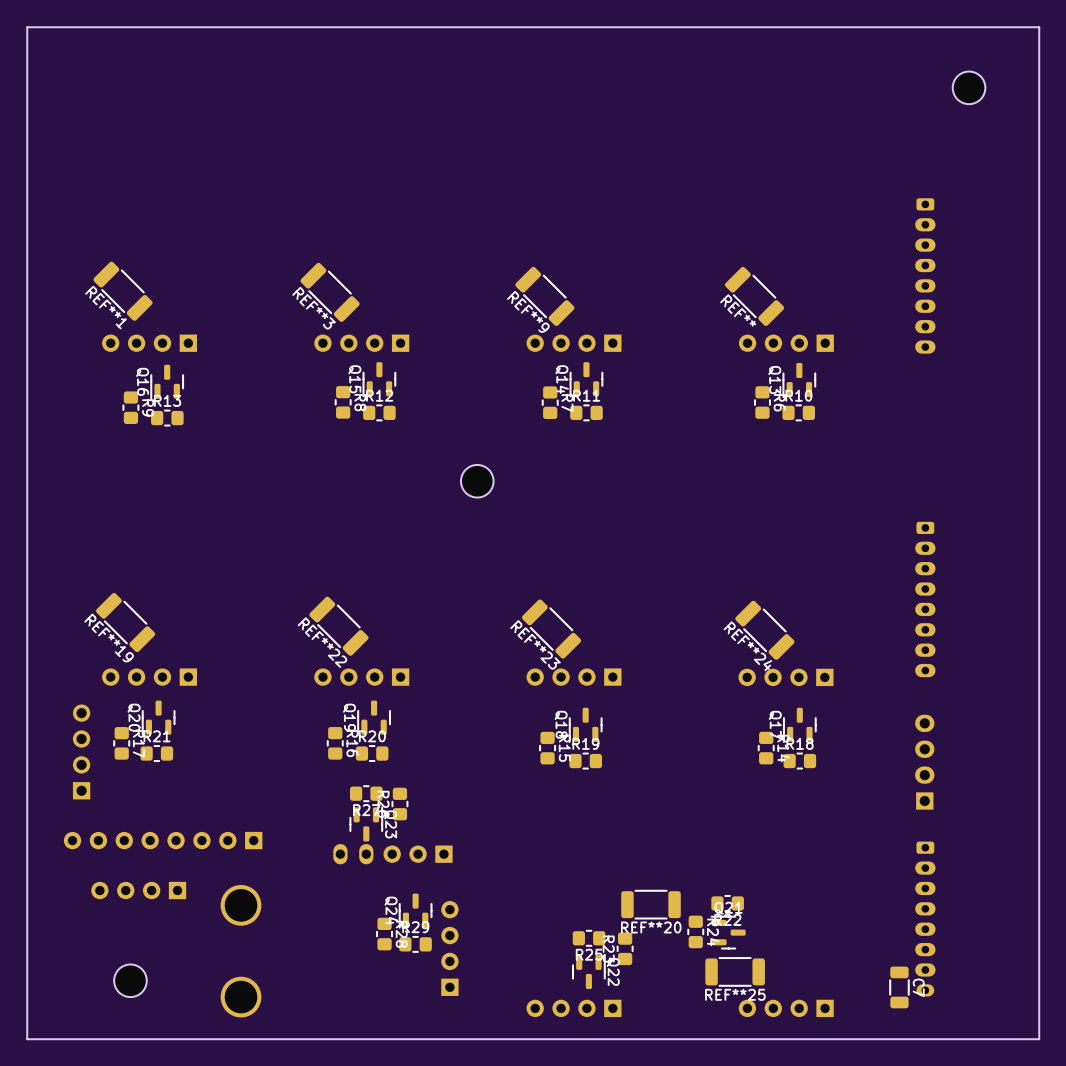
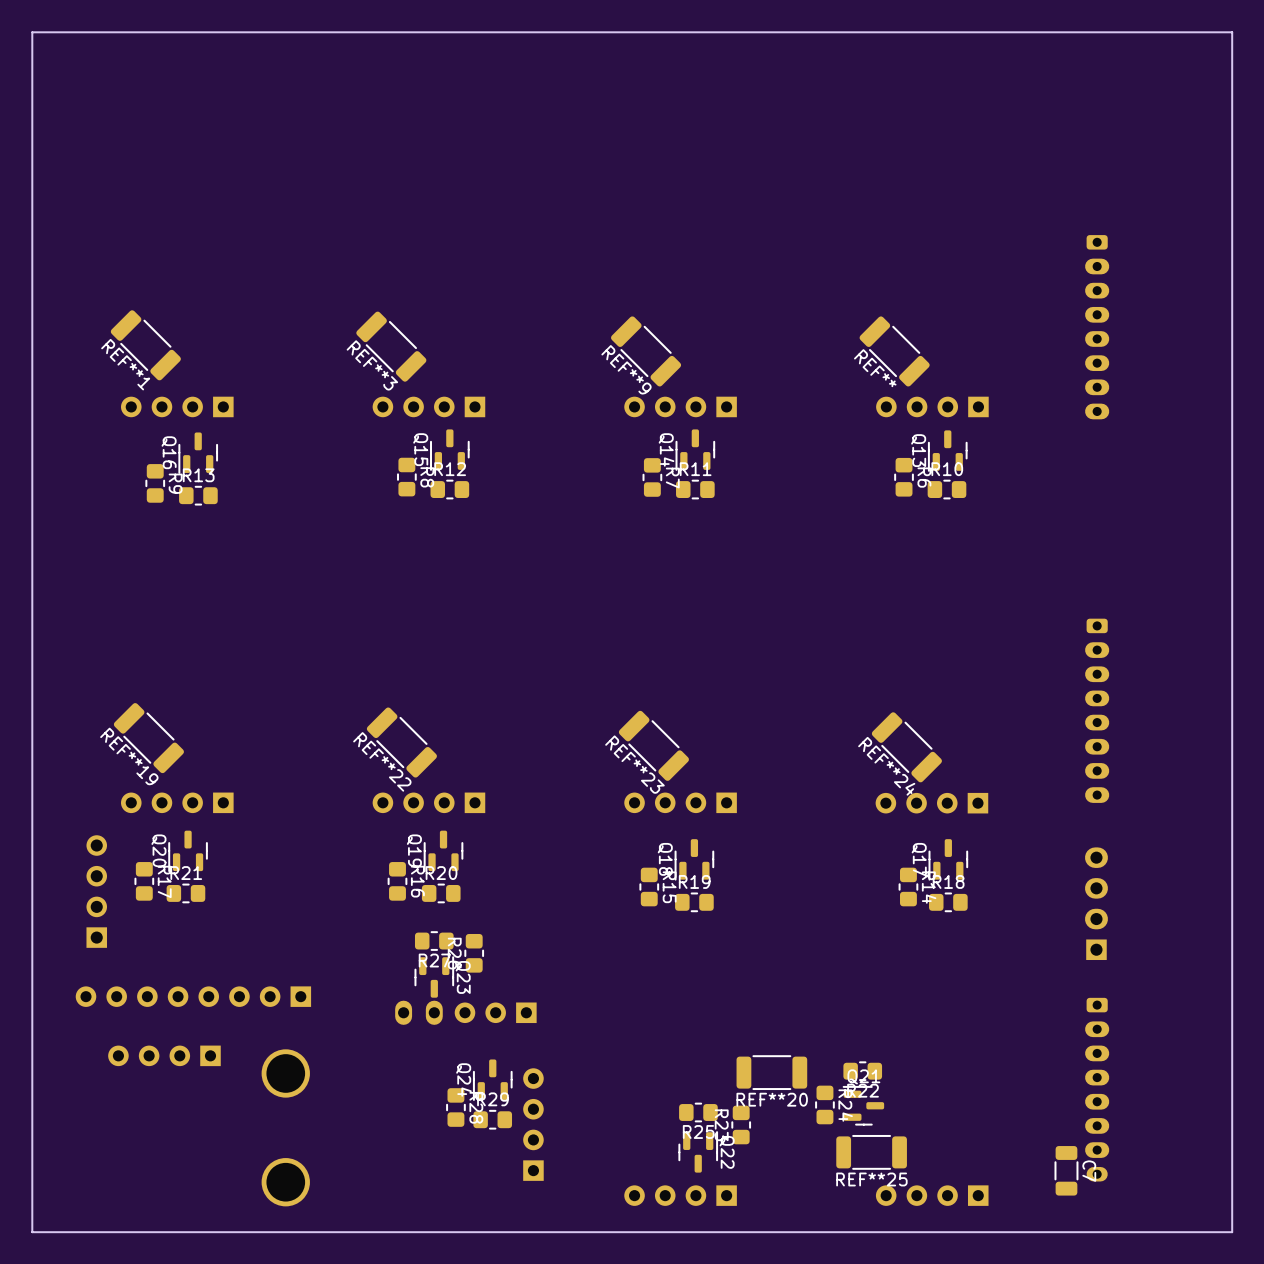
part: (969, 87) -> none
part: (477, 481) -> none
part: (130, 980) -> none

